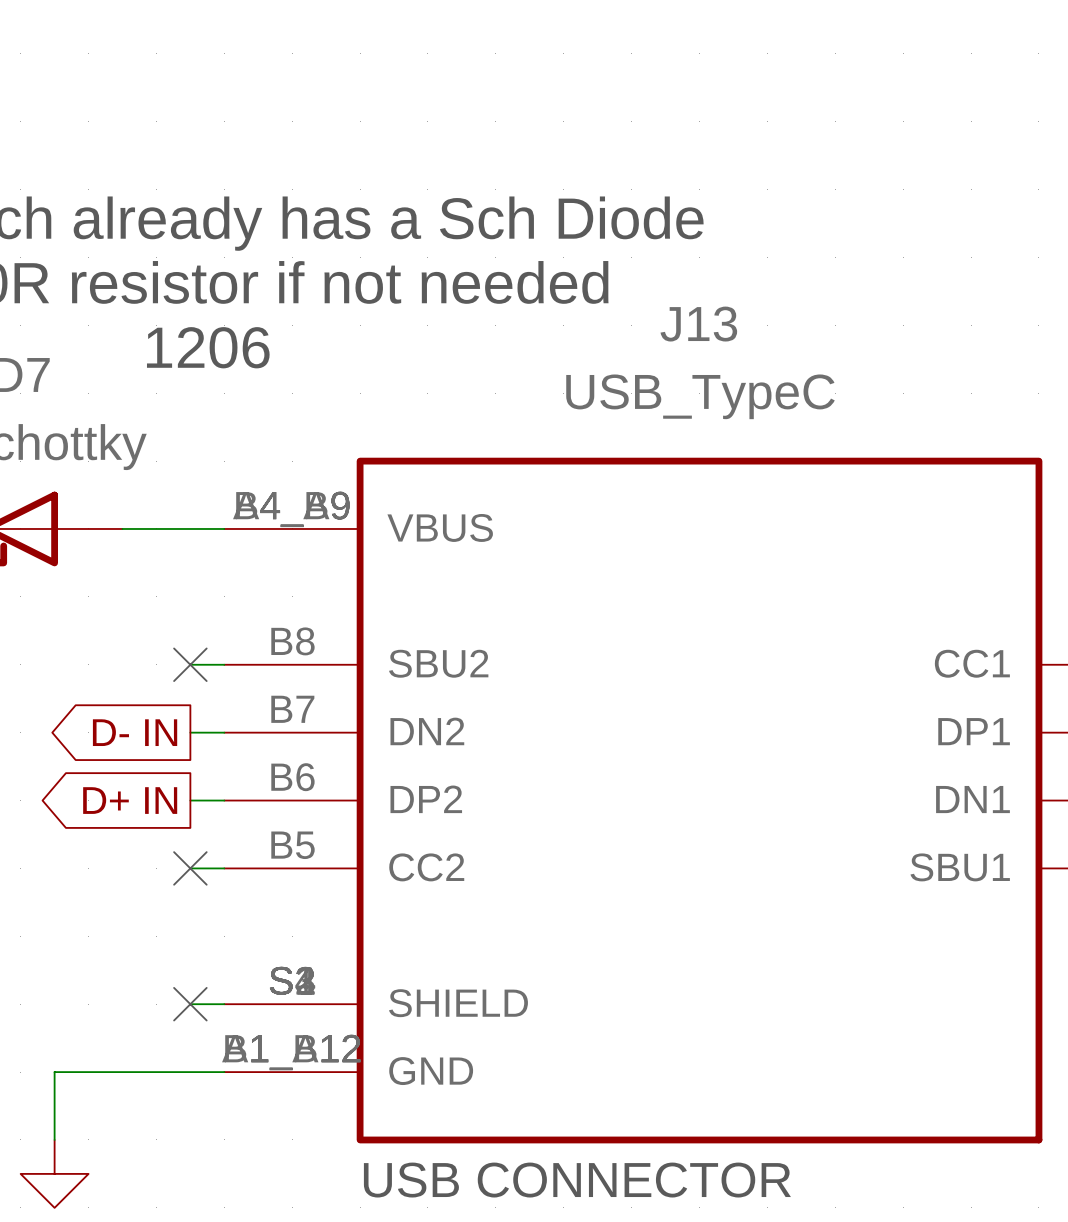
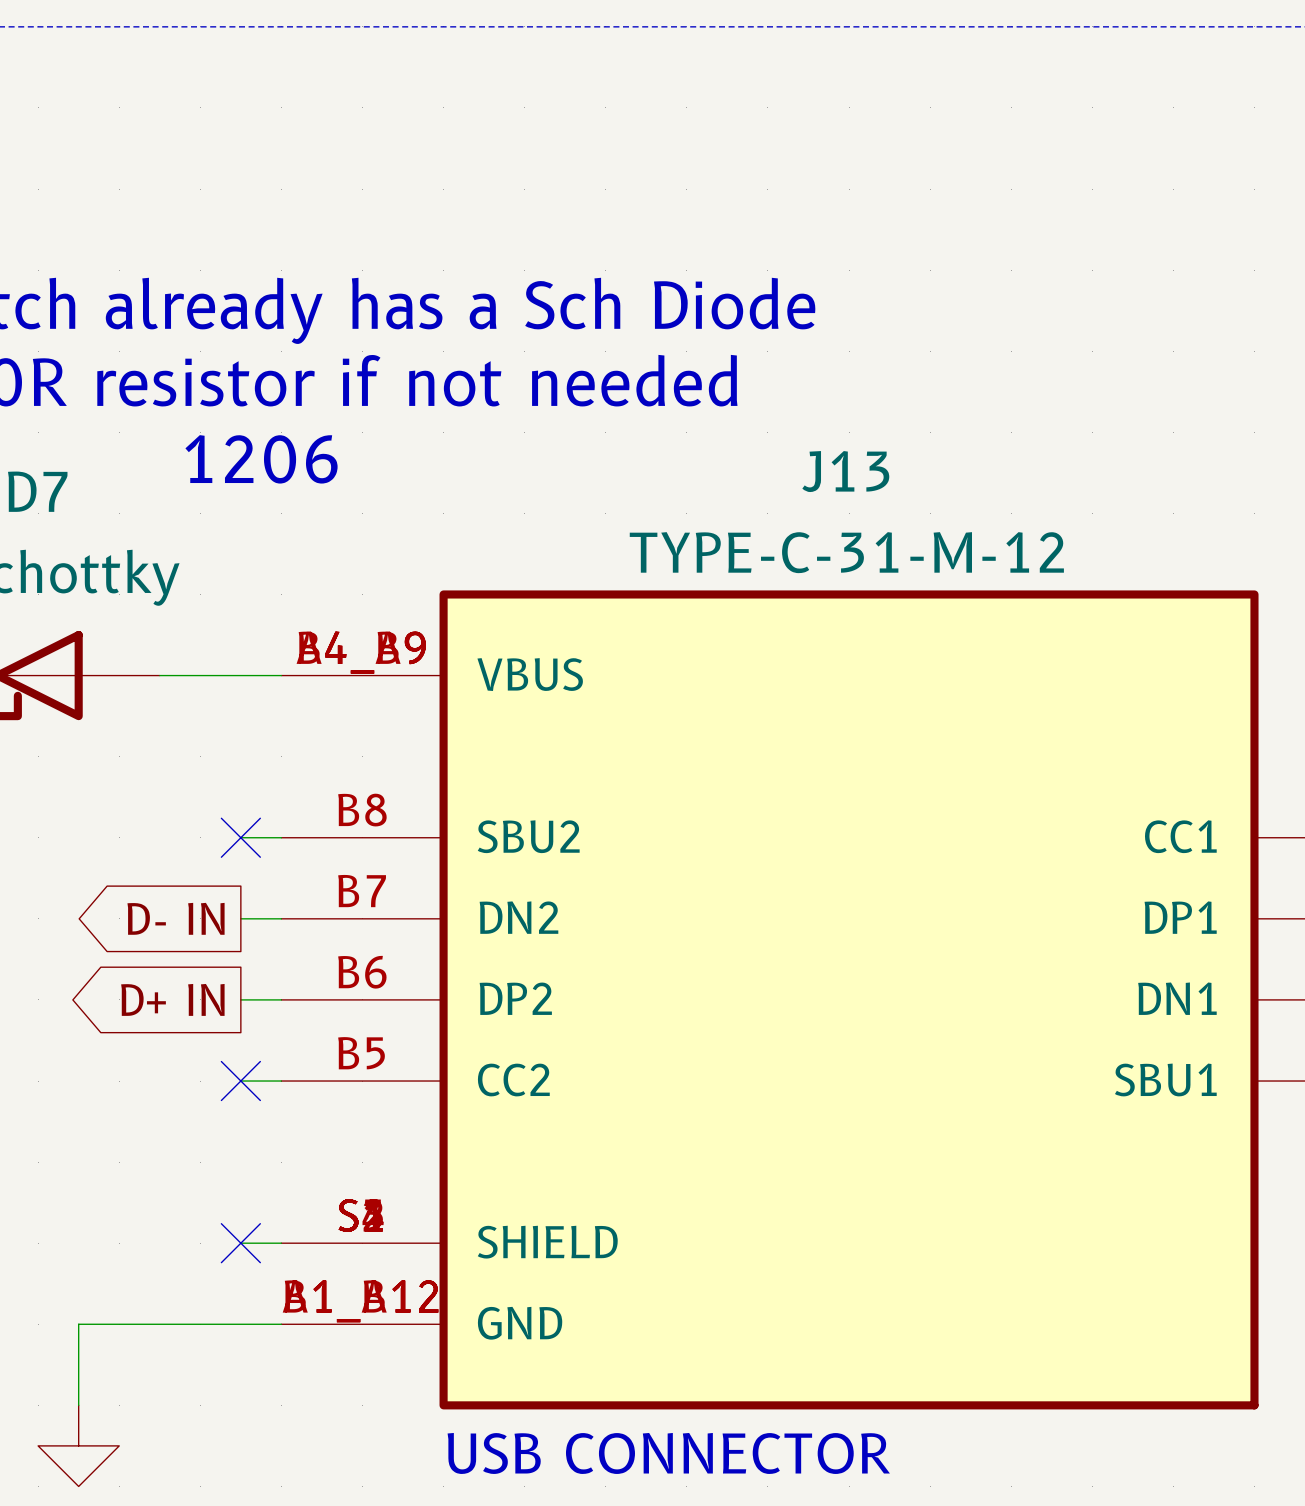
J13 name position: J13 (698, 324) -> J13 (845, 471)
J13 value: USB_TypeC (700, 396) -> TYPE-C-31-M-12 (846, 552)

